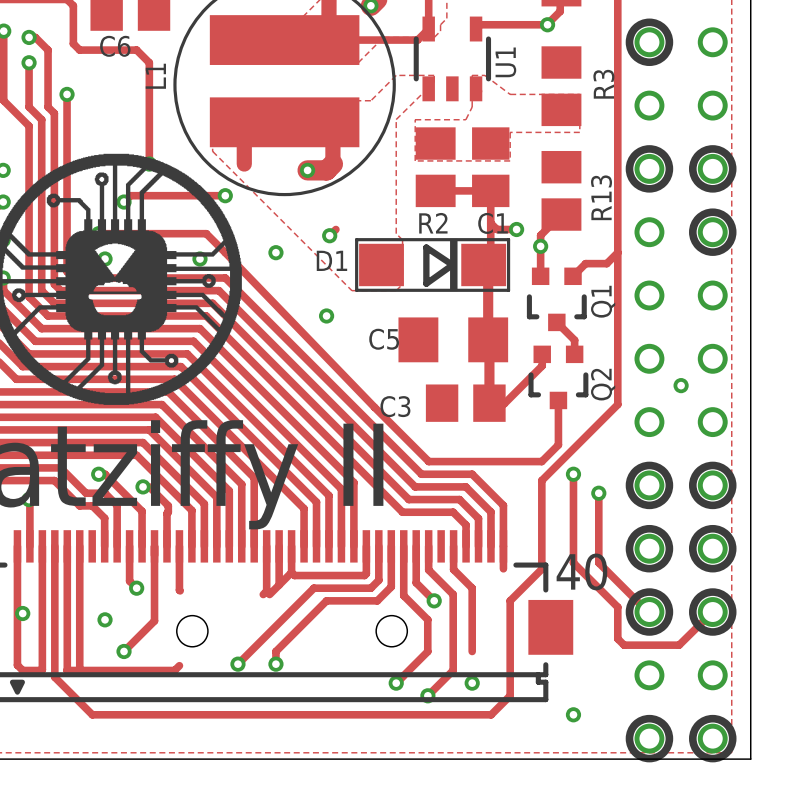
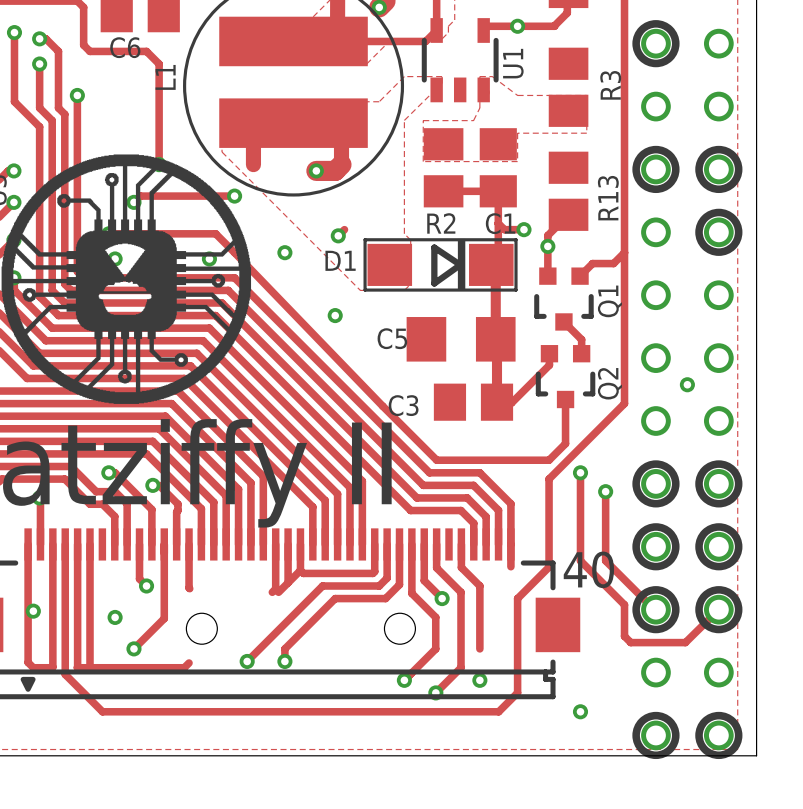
via position: (547, 24) -> (517, 26)

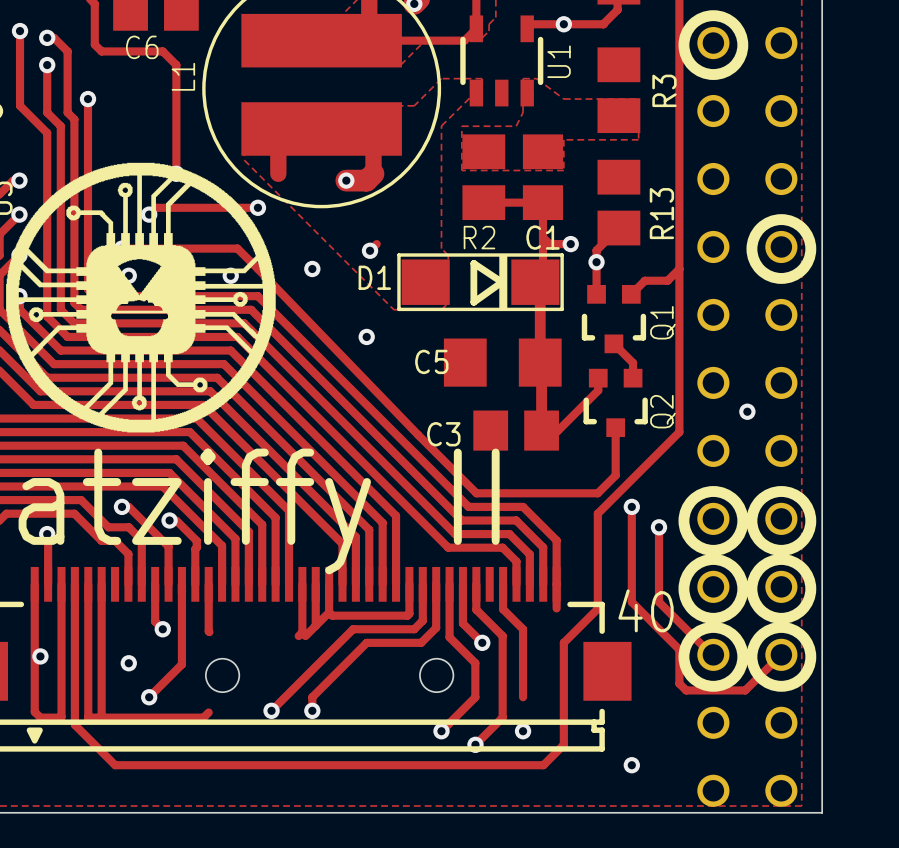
drawing shape: [632, 20, 680, 68] -> [678, 10, 749, 80]
drawing: [632, 145, 743, 194] -> none
drawing shape: [695, 208, 743, 256] -> [746, 214, 817, 284]
drawing shape: [632, 460, 680, 508] -> [678, 486, 749, 556]
drawing shape: [695, 460, 743, 508] -> [746, 486, 817, 556]
drawing shape: [632, 523, 680, 571] -> [678, 554, 749, 624]
drawing shape: [695, 523, 743, 571] -> [746, 554, 817, 624]
drawing shape: [632, 586, 680, 634] -> [678, 622, 749, 692]
drawing shape: [695, 586, 743, 634] -> [746, 622, 817, 692]
drawing: [632, 711, 743, 760] -> none

